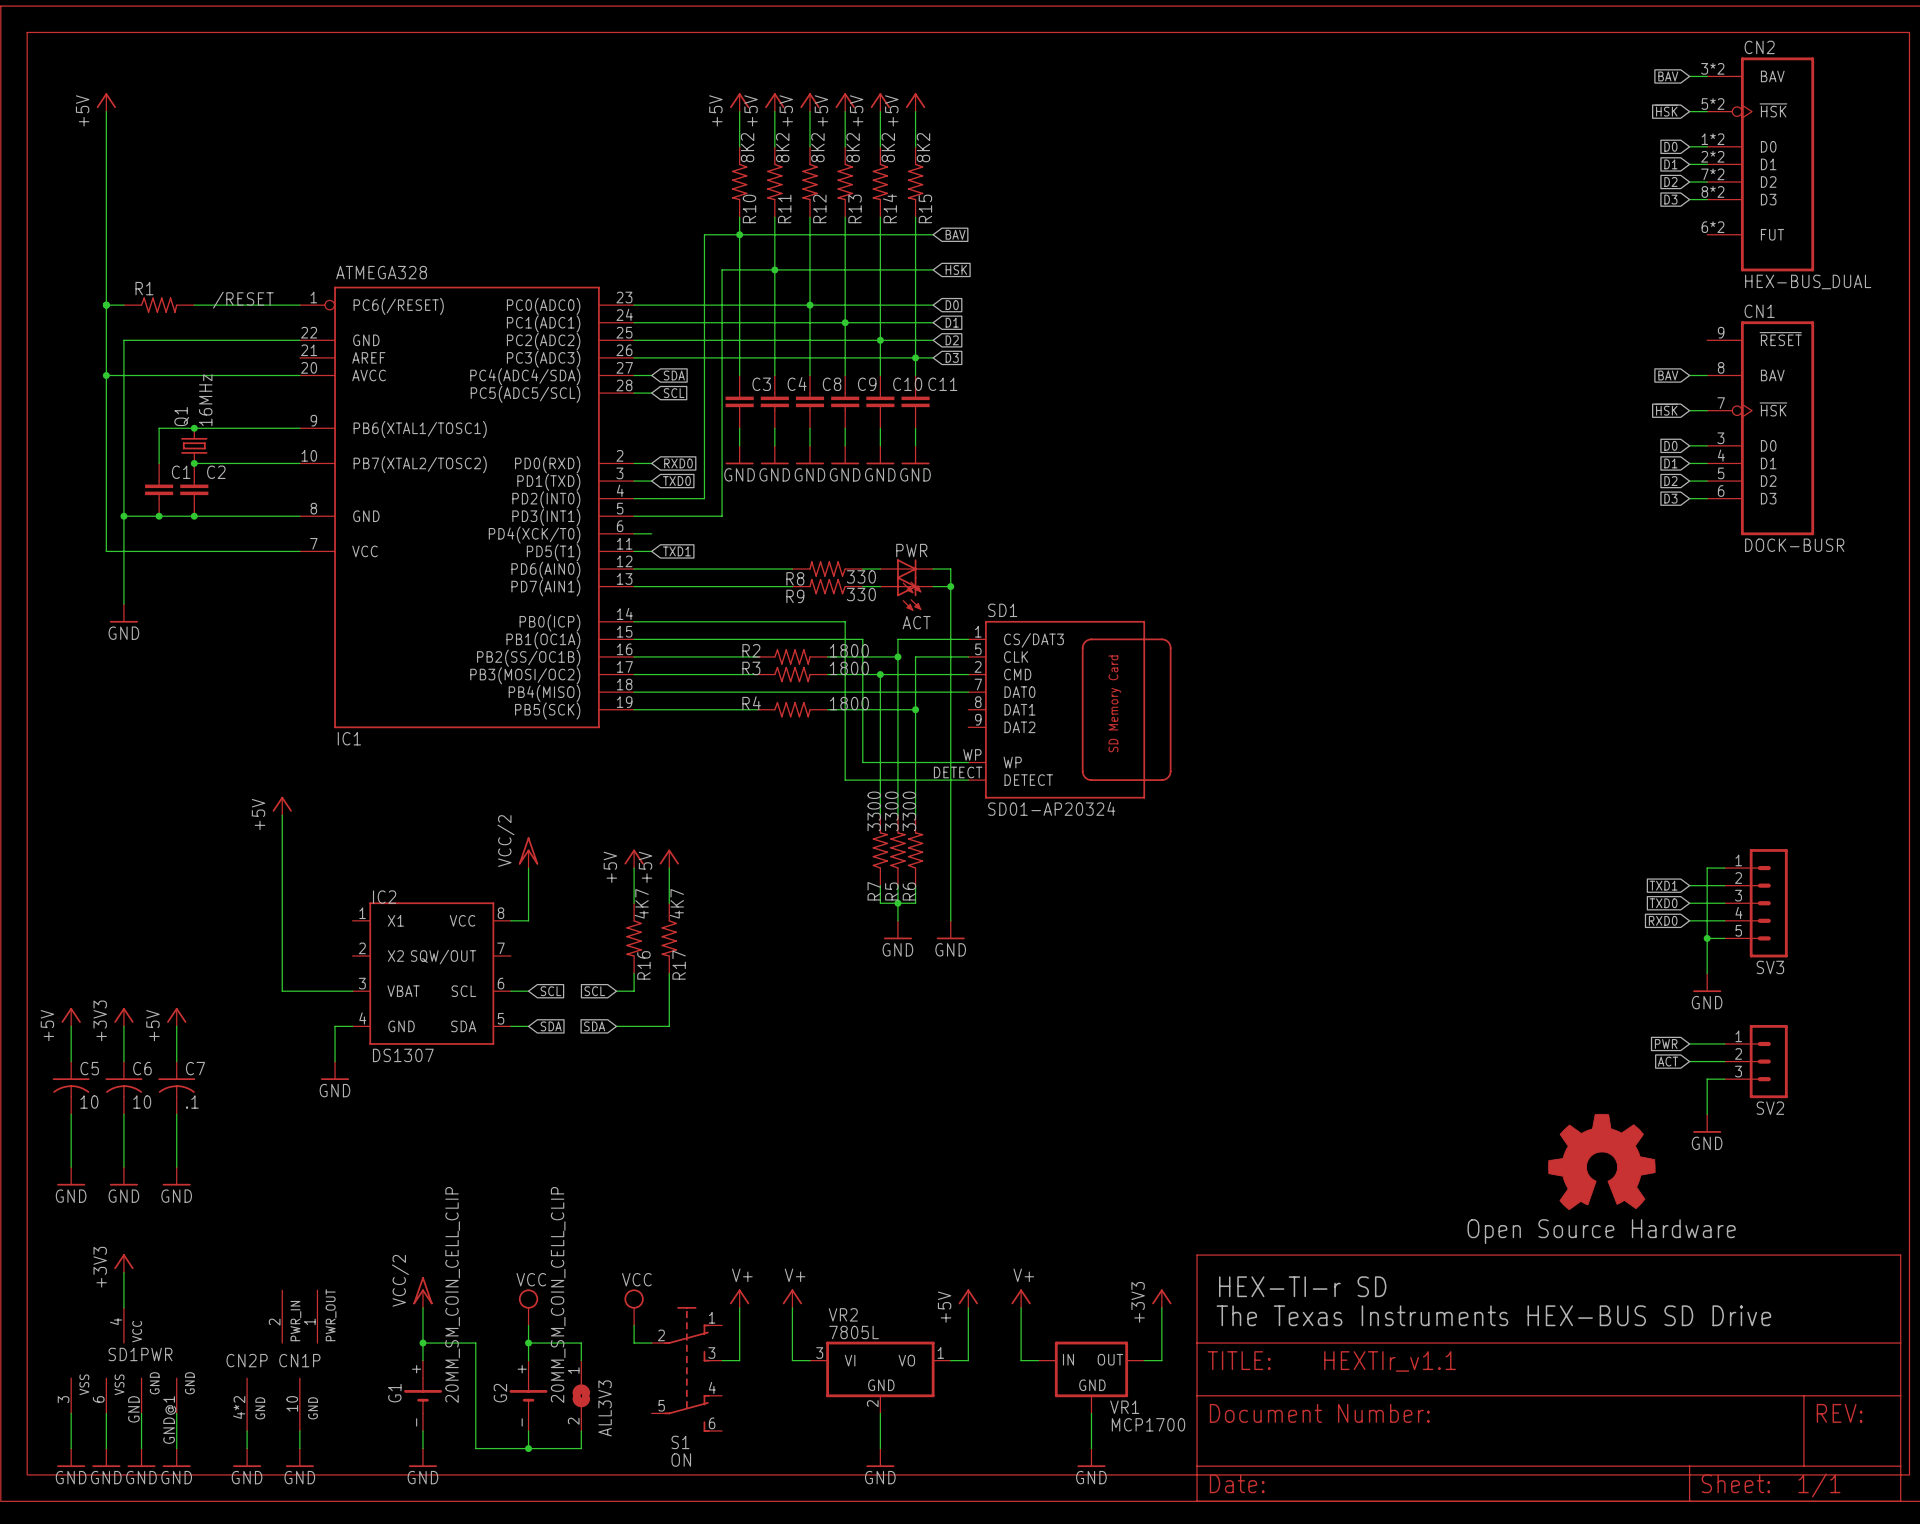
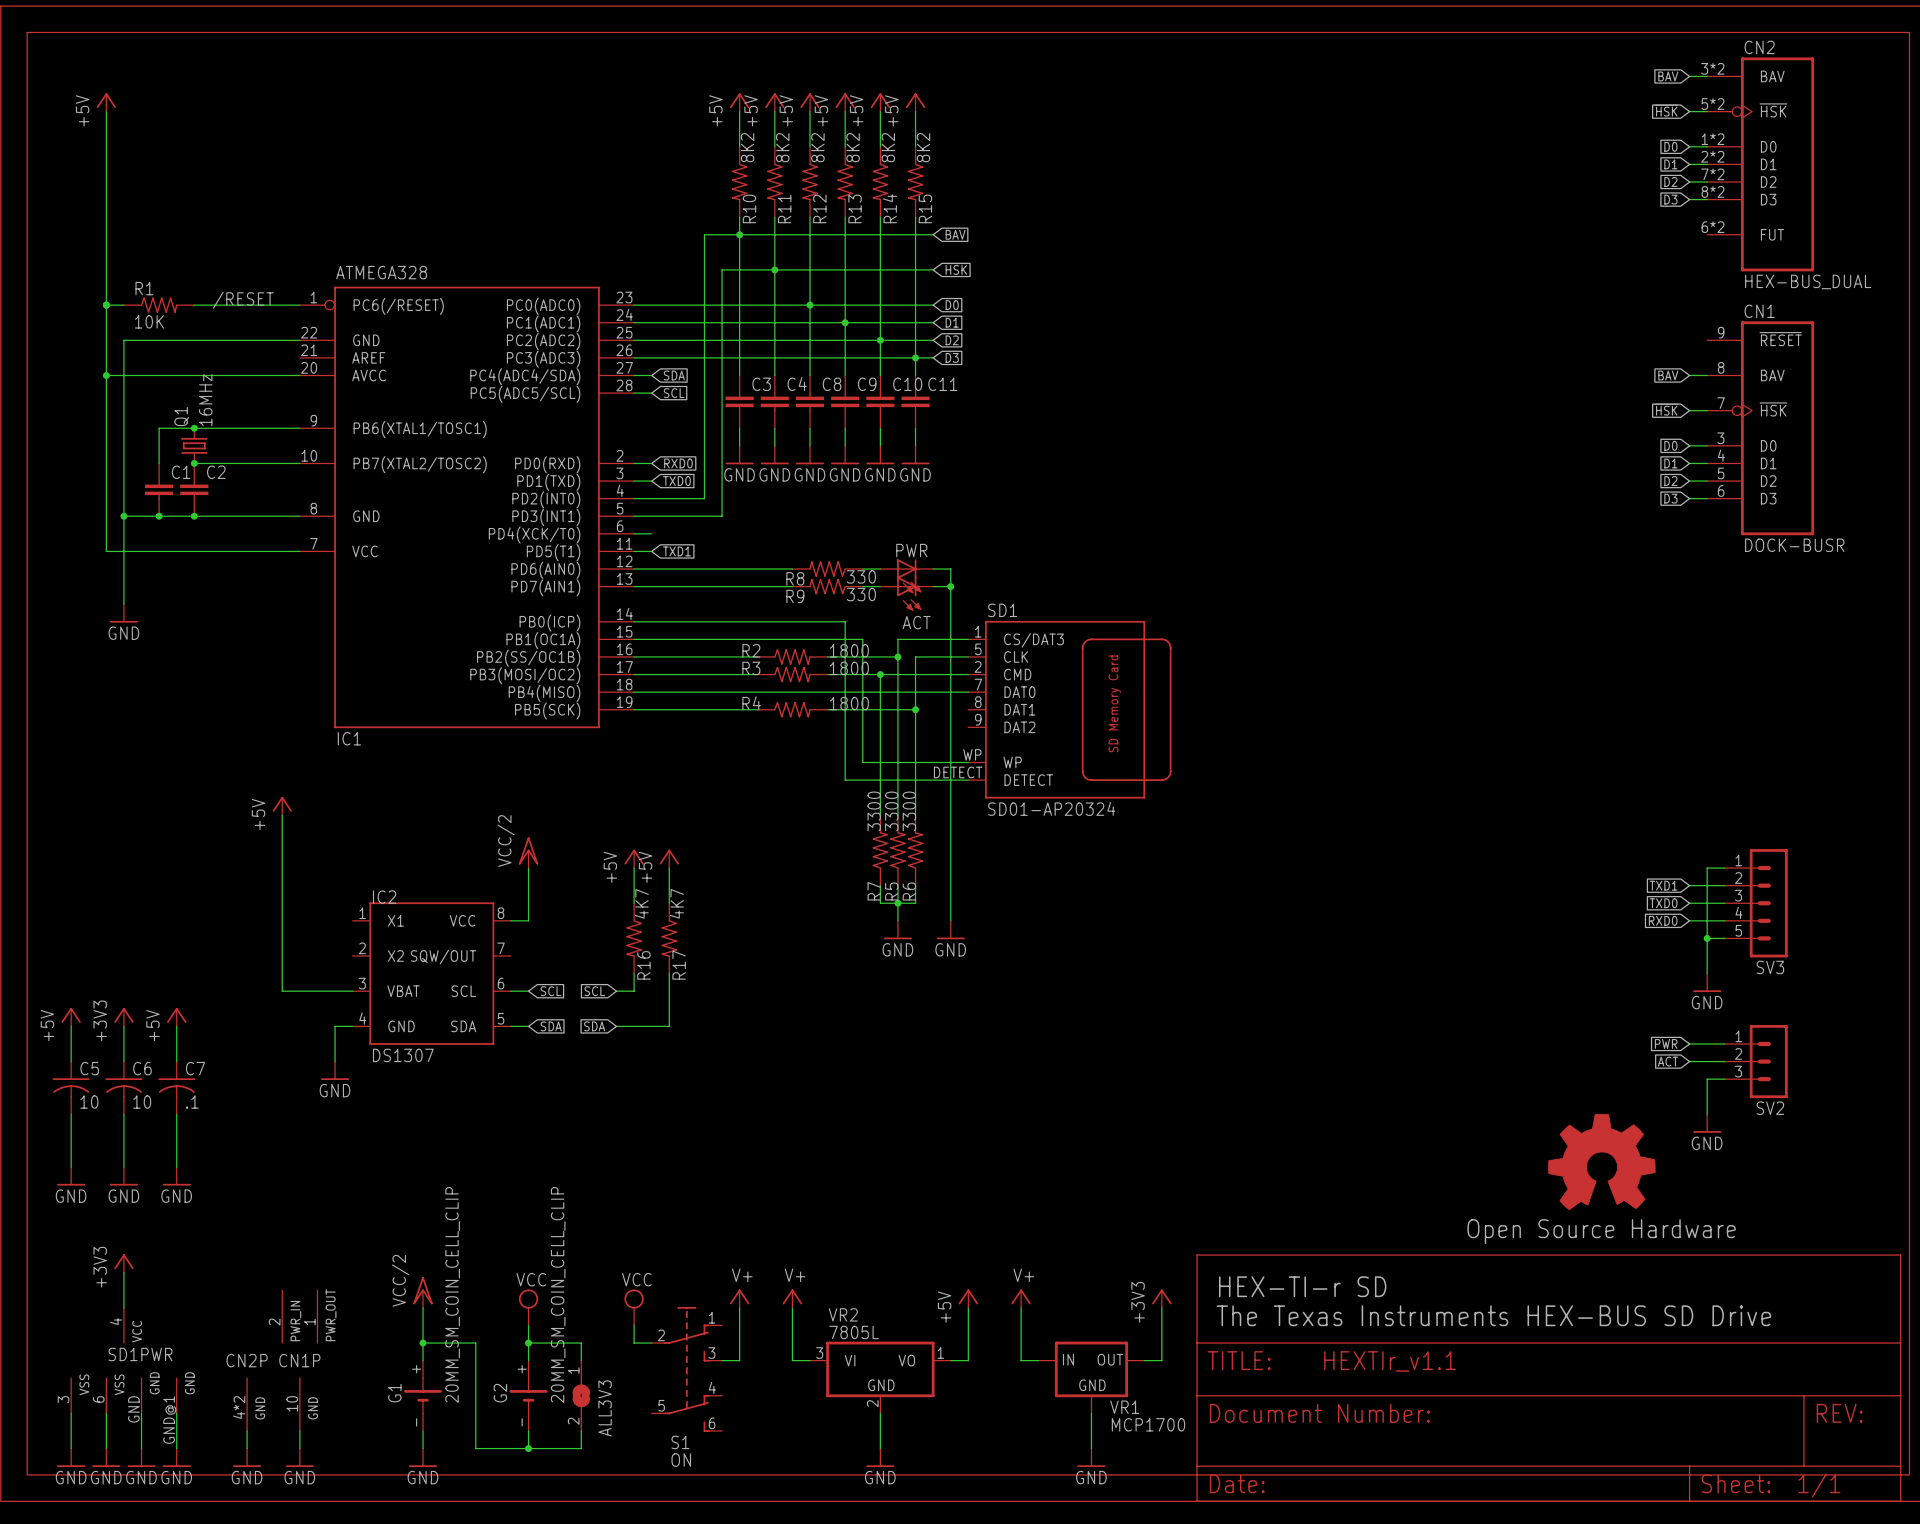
R1 value: none -> 10K (149, 321)

